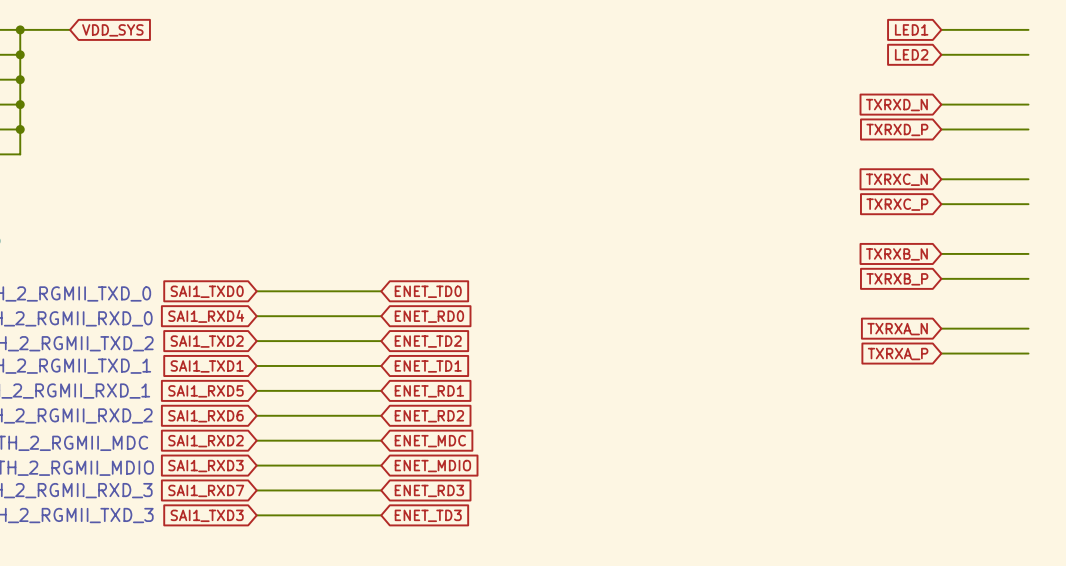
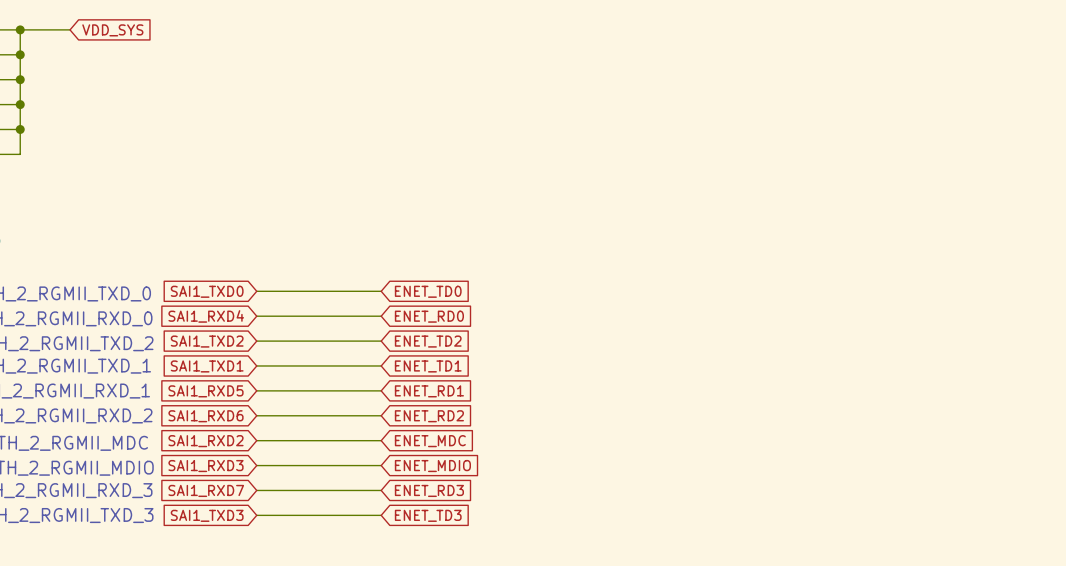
global label: LED1 (911, 29) -> none
wire: (941, 29) (1028, 29) -> none
global label: LED2 (911, 54) -> none
wire: (941, 54) (1028, 54) -> none
wire: (941, 104) (1028, 104) -> none
global label: TXRXD_N (896, 105) -> none
global label: TXRXD_P (897, 129) -> none
wire: (941, 129) (1028, 129) -> none
global label: TXRXC_N (896, 179) -> none
wire: (941, 179) (1028, 179) -> none
global label: TXRXC_P (897, 204) -> none
wire: (941, 204) (1028, 204) -> none
wire: (941, 253) (1028, 253) -> none
global label: TXRXB_N (896, 254) -> none
wire: (941, 278) (1028, 278) -> none
global label: TXRXB_P (897, 279) -> none
wire: (941, 328) (1028, 328) -> none
global label: TXRXA_N (897, 329) -> none
wire: (941, 353) (1028, 353) -> none
global label: TXRXA_P (898, 354) -> none

